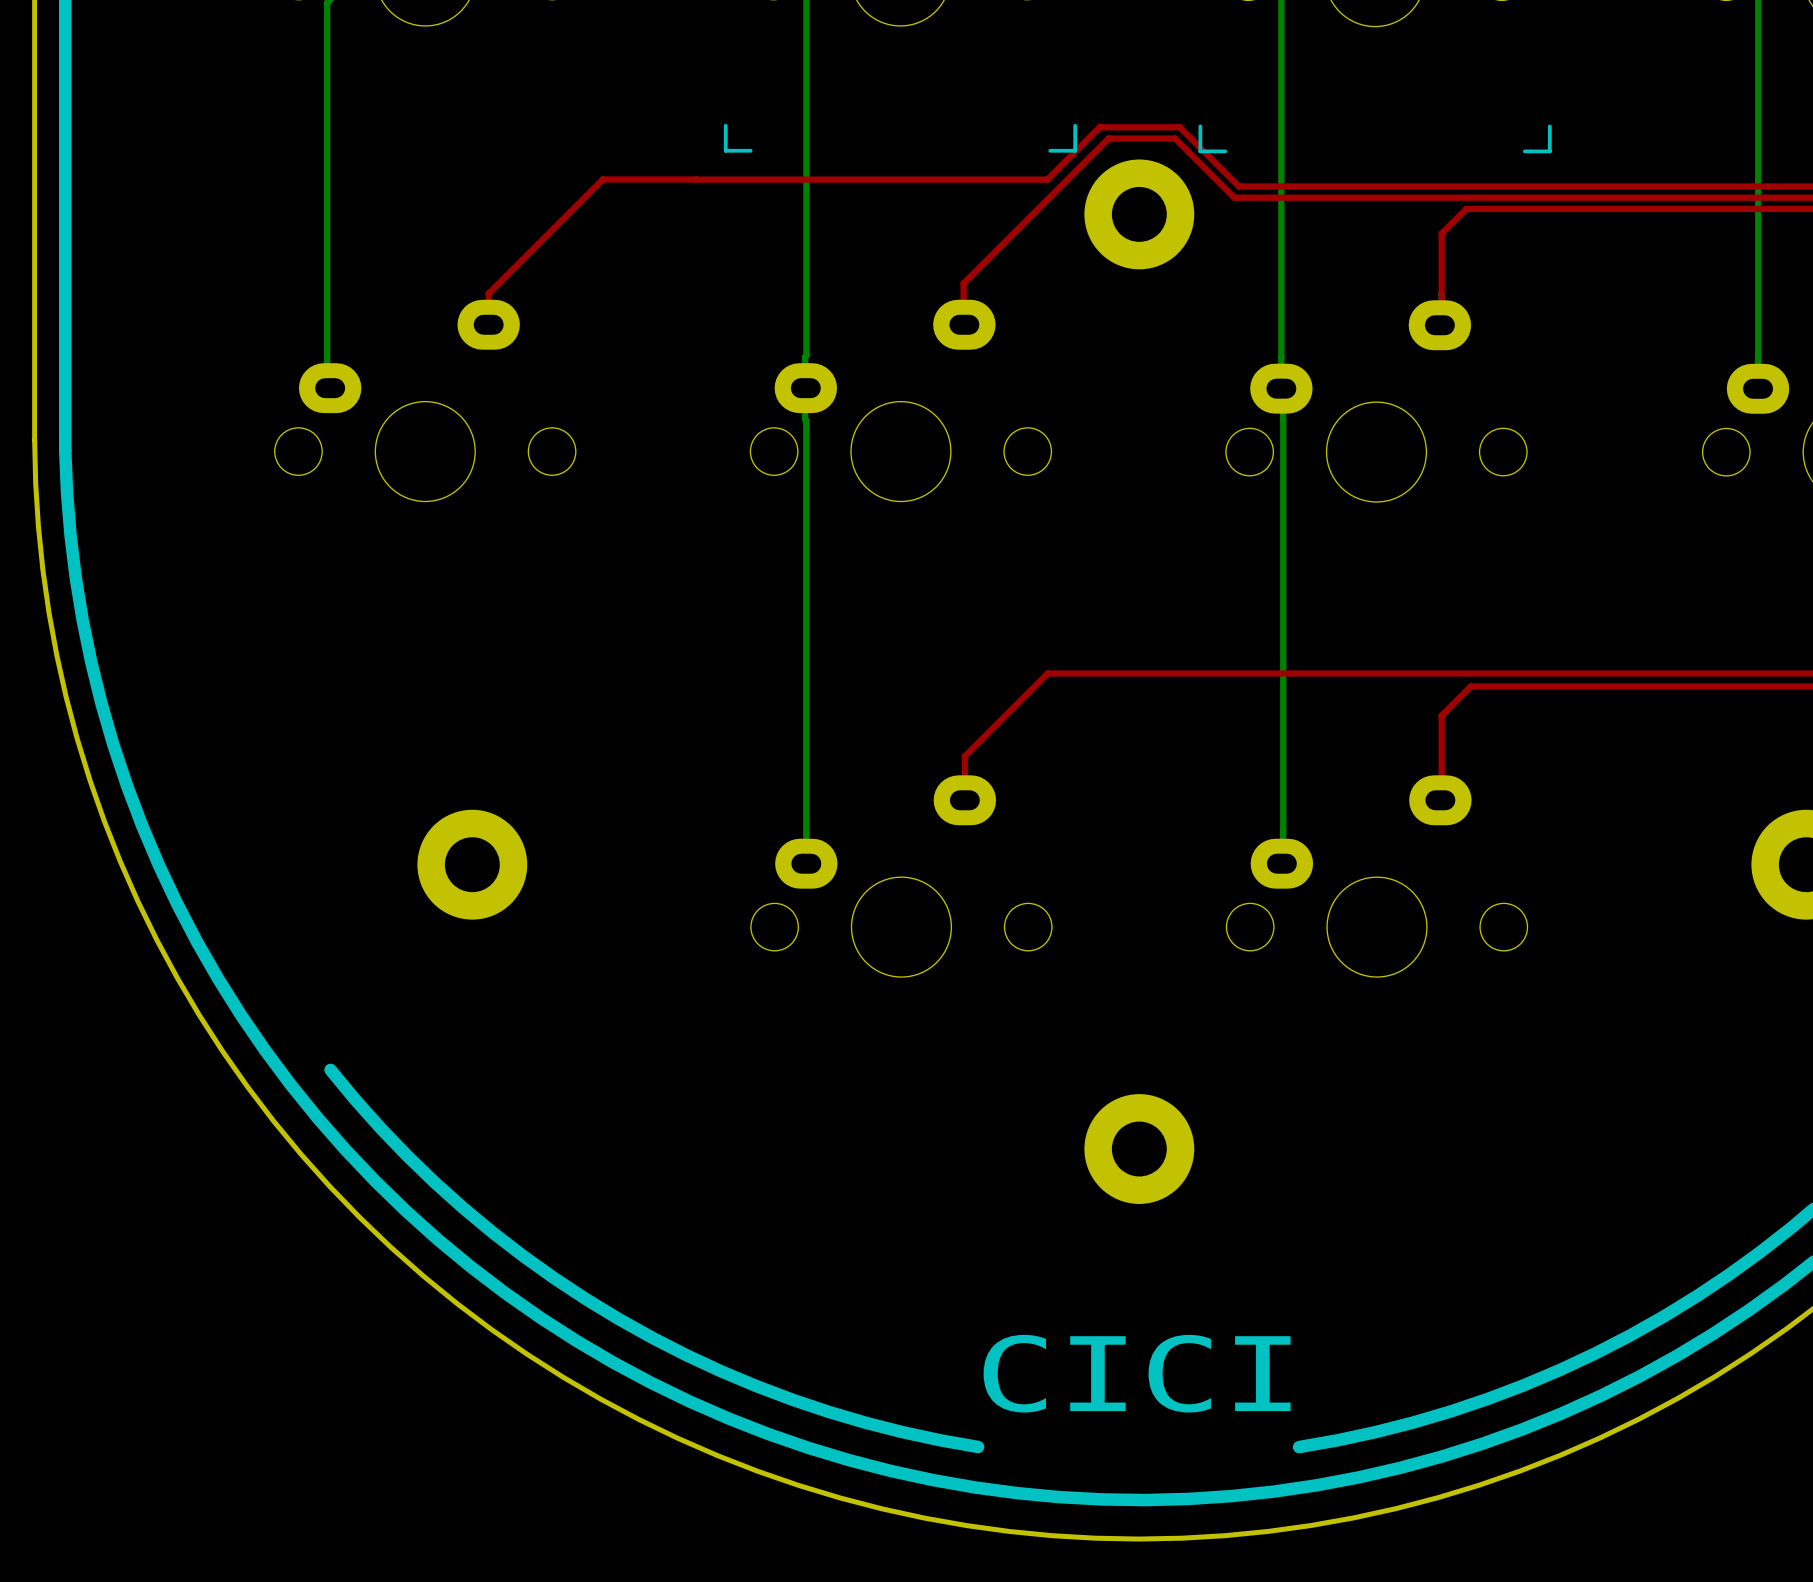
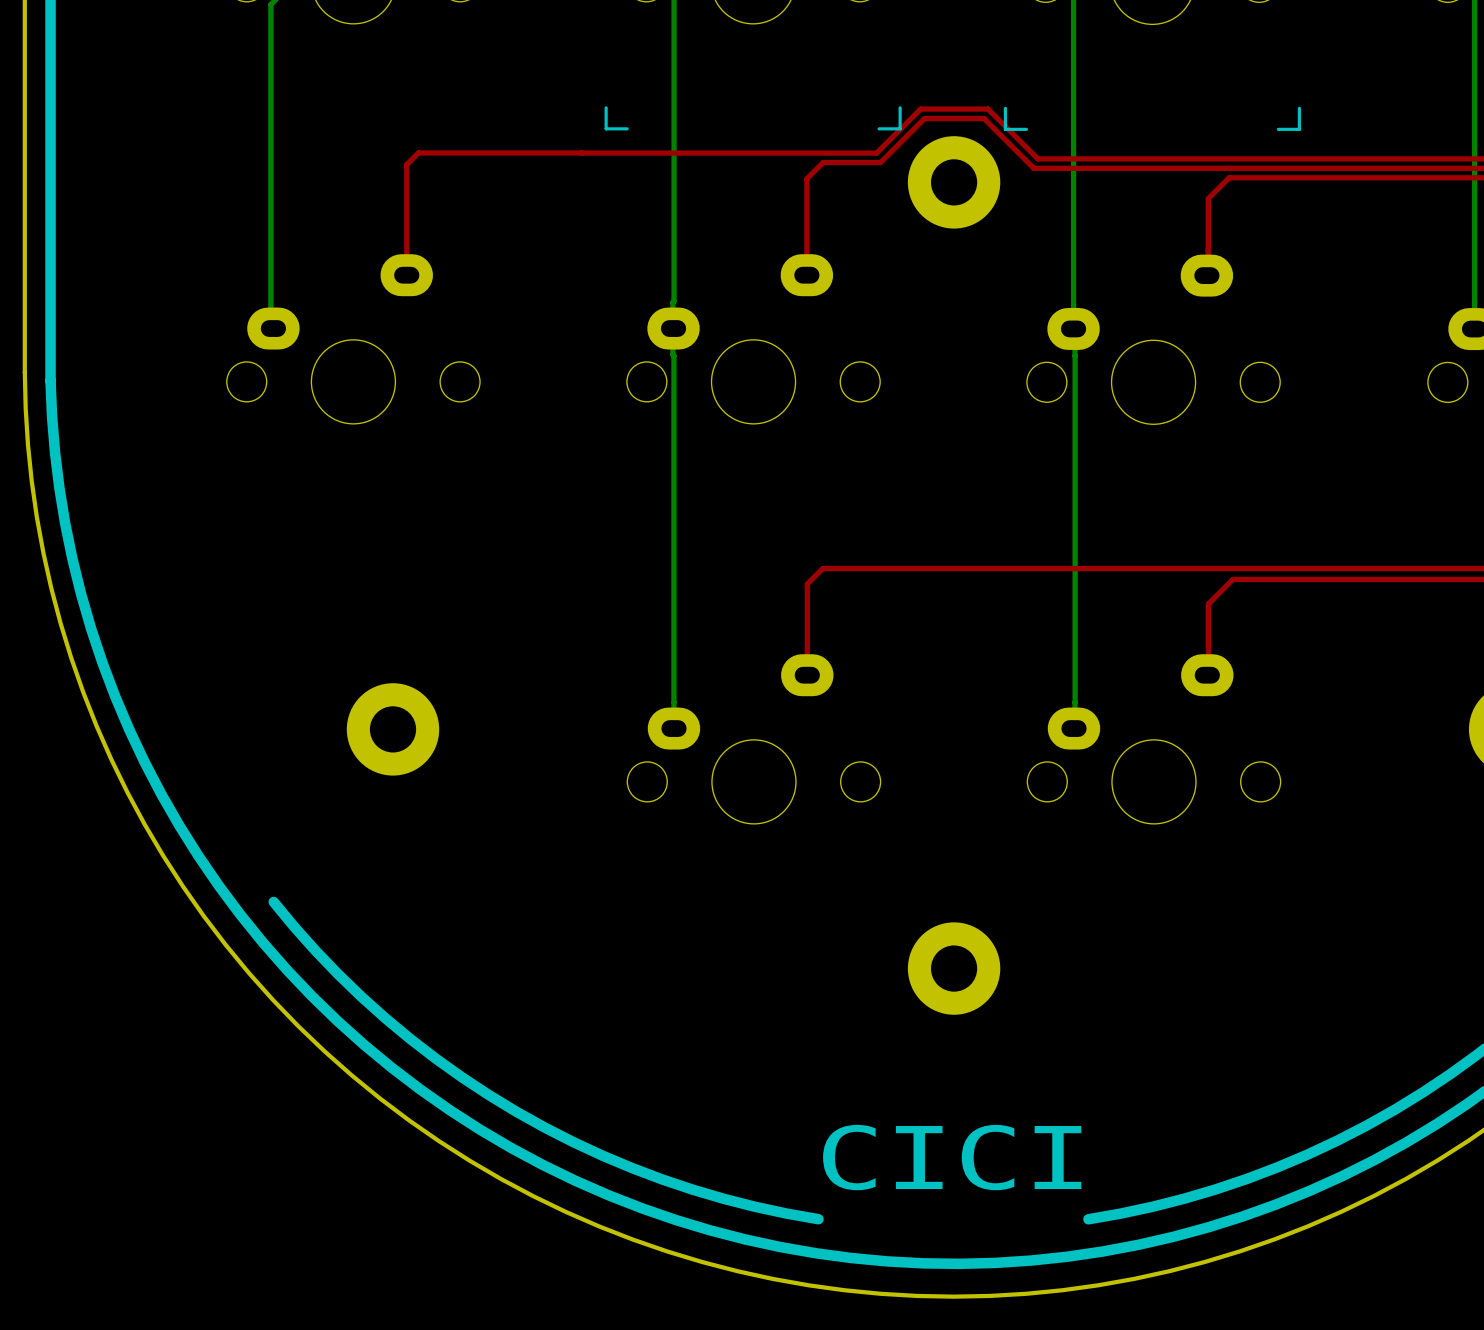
top track: (1108, 138) (963, 283) (963, 324) -> (928, 118) (924, 118) (880, 162) (823, 162) (806, 178) (806, 275)
top track: (602, 179) (488, 293) -> (502, 152) (418, 152) (406, 164) (406, 248)
top track: (1047, 673) (964, 756) -> (877, 568) (822, 568) (807, 584) (807, 638)

